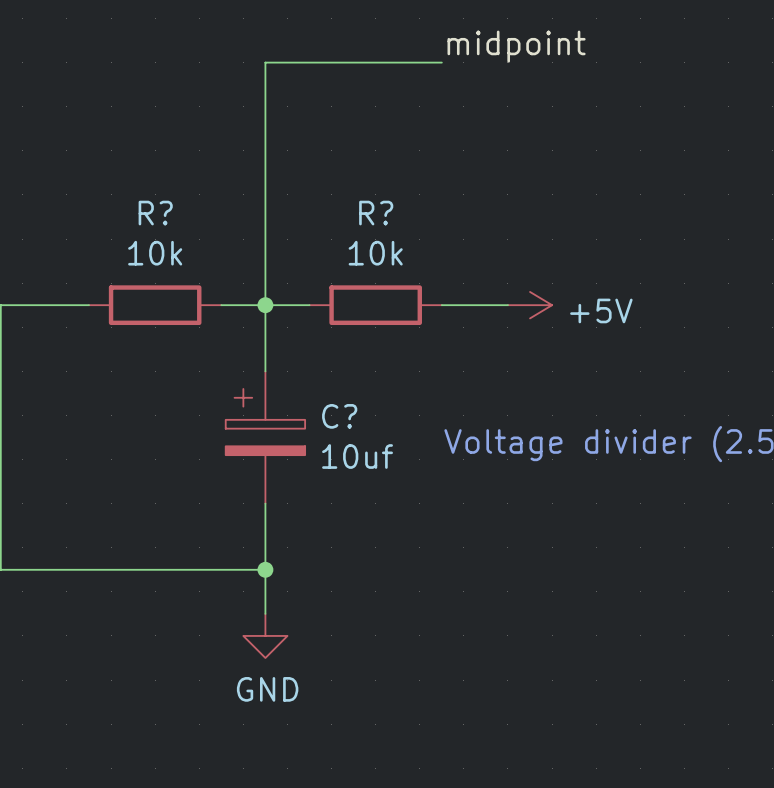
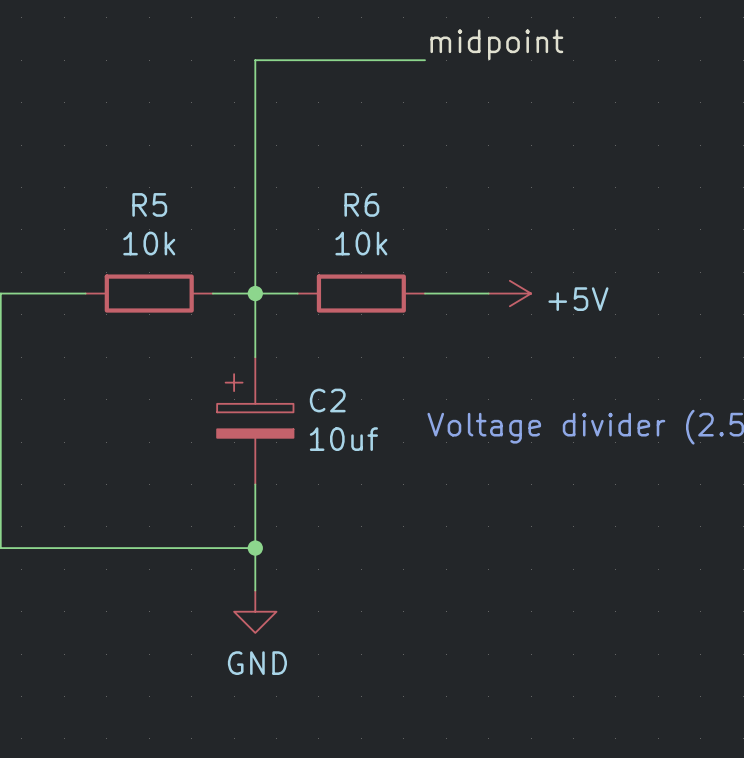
R? name: R? (155, 213) -> R5 (149, 204)
R? name: R? (376, 213) -> R6 (361, 204)
C? name: C? (339, 416) -> C2 (327, 400)

